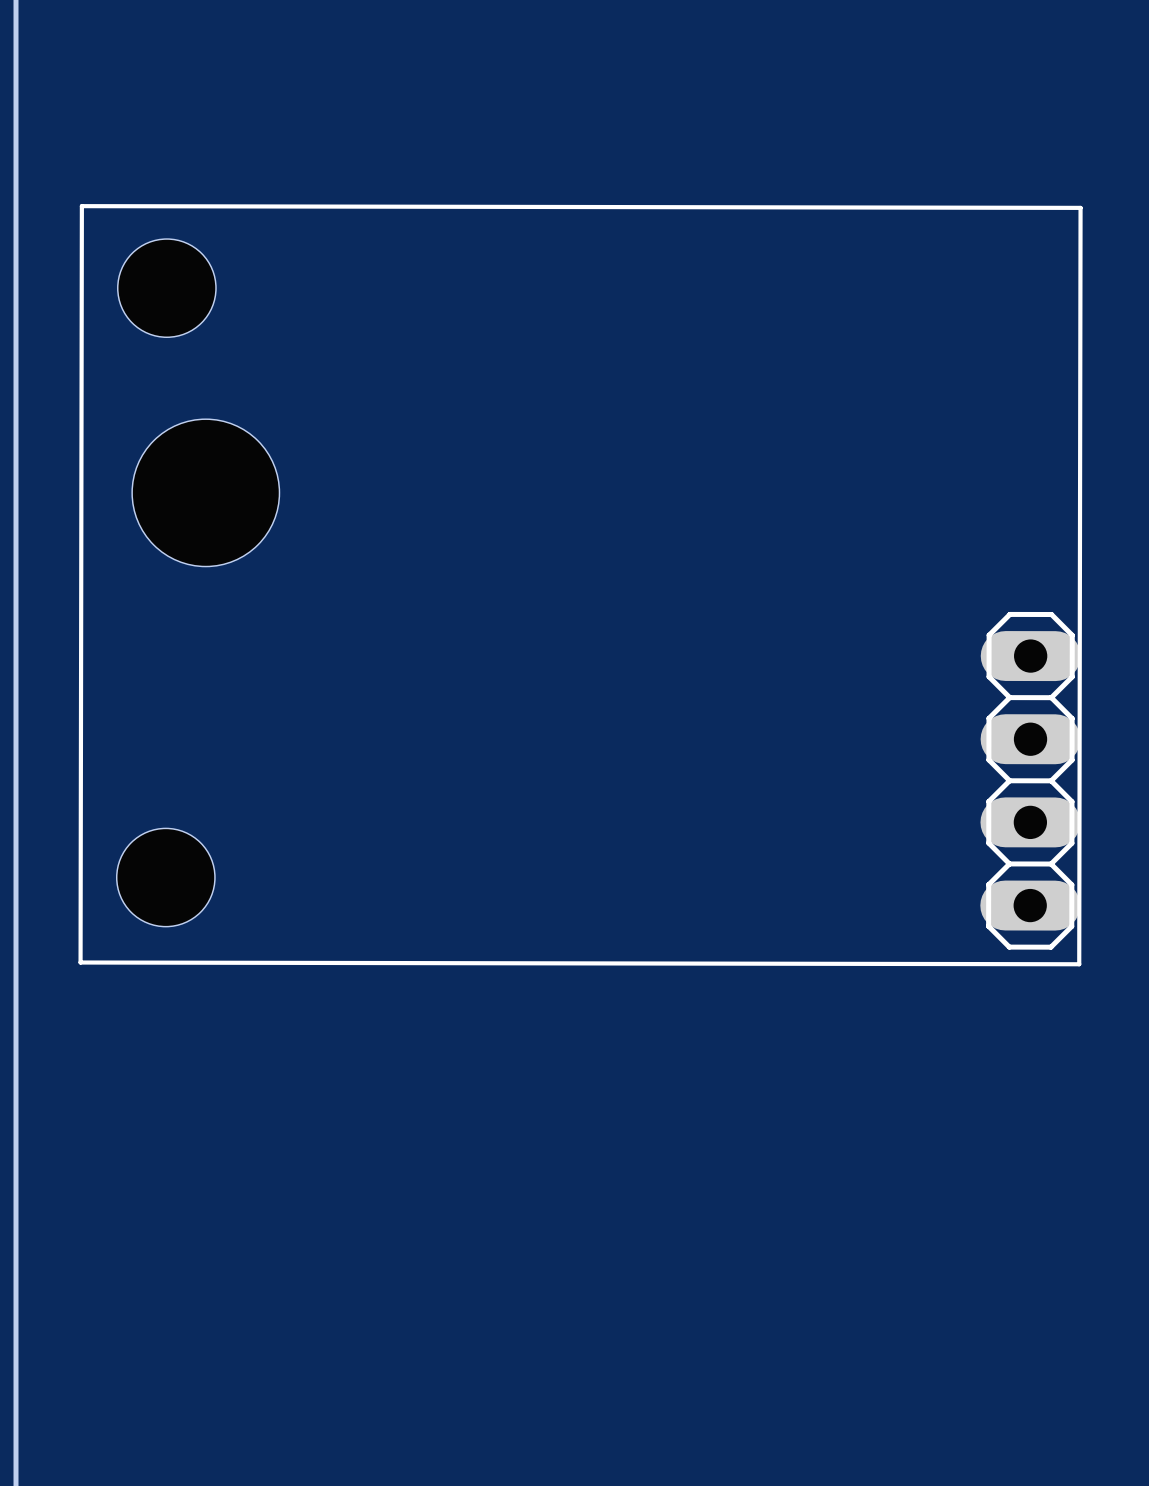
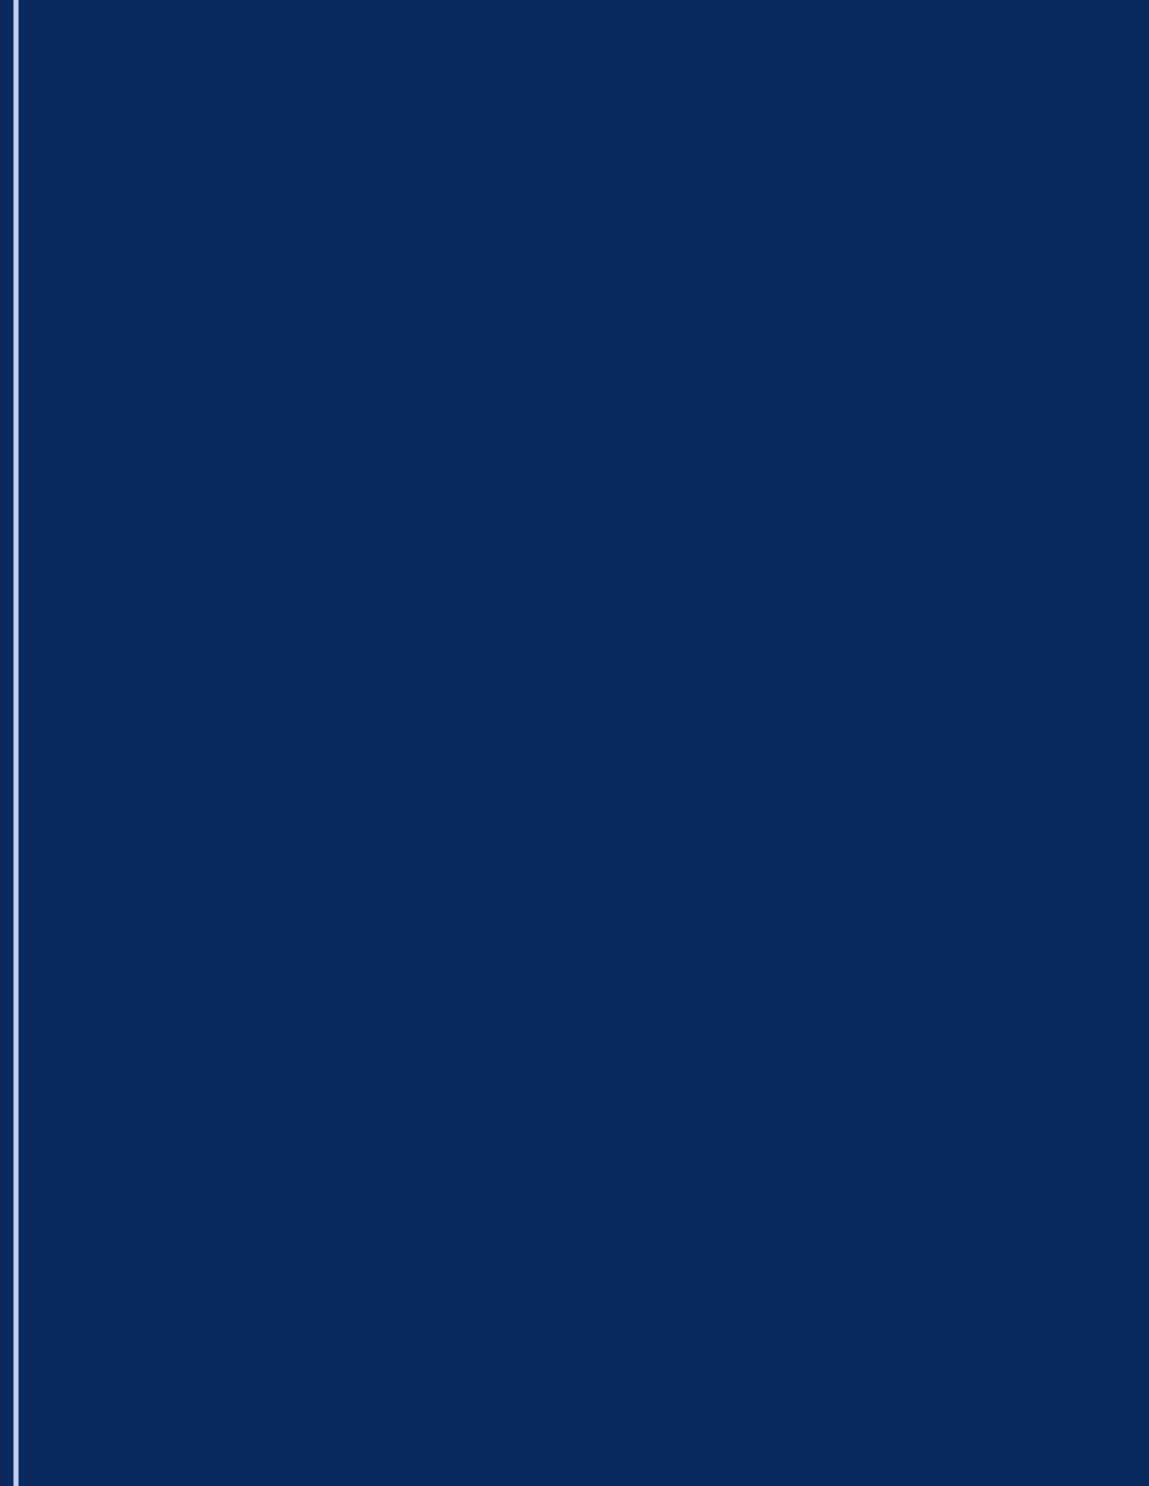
part: (580, 585) -> none

